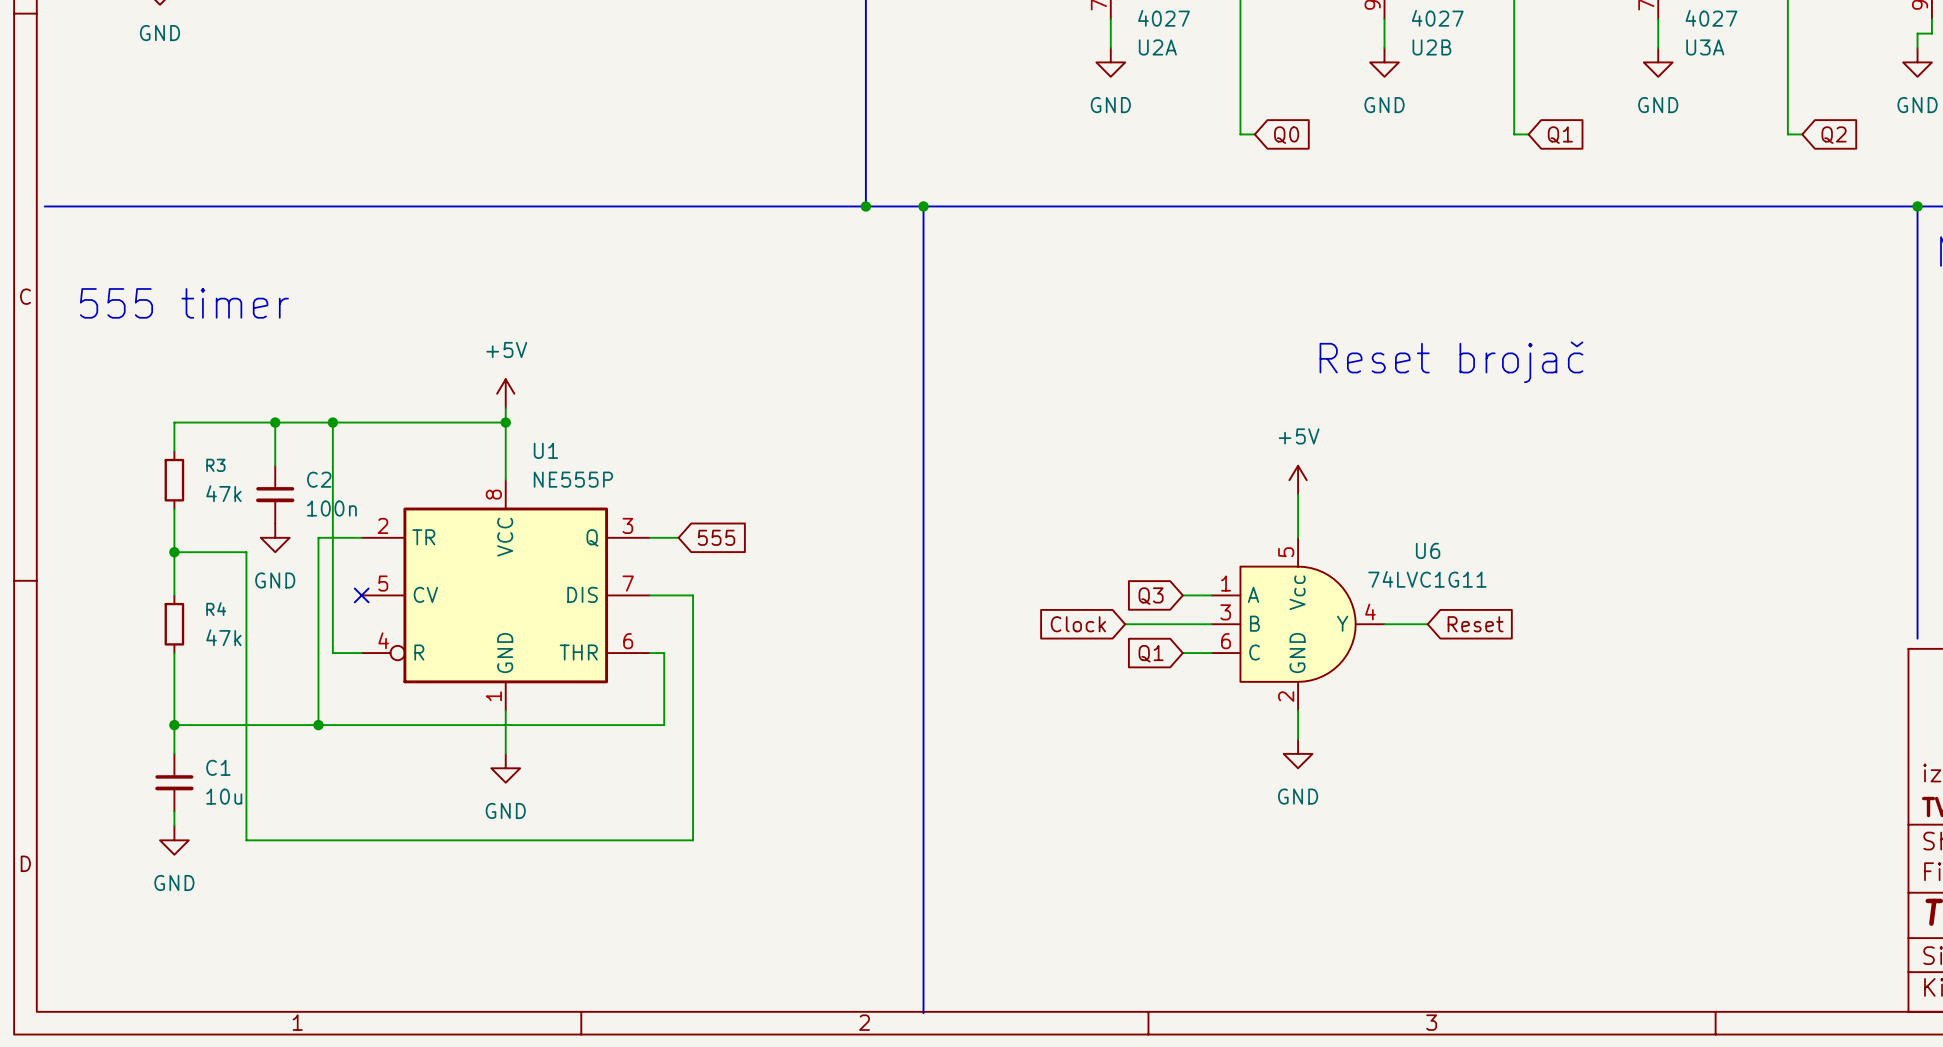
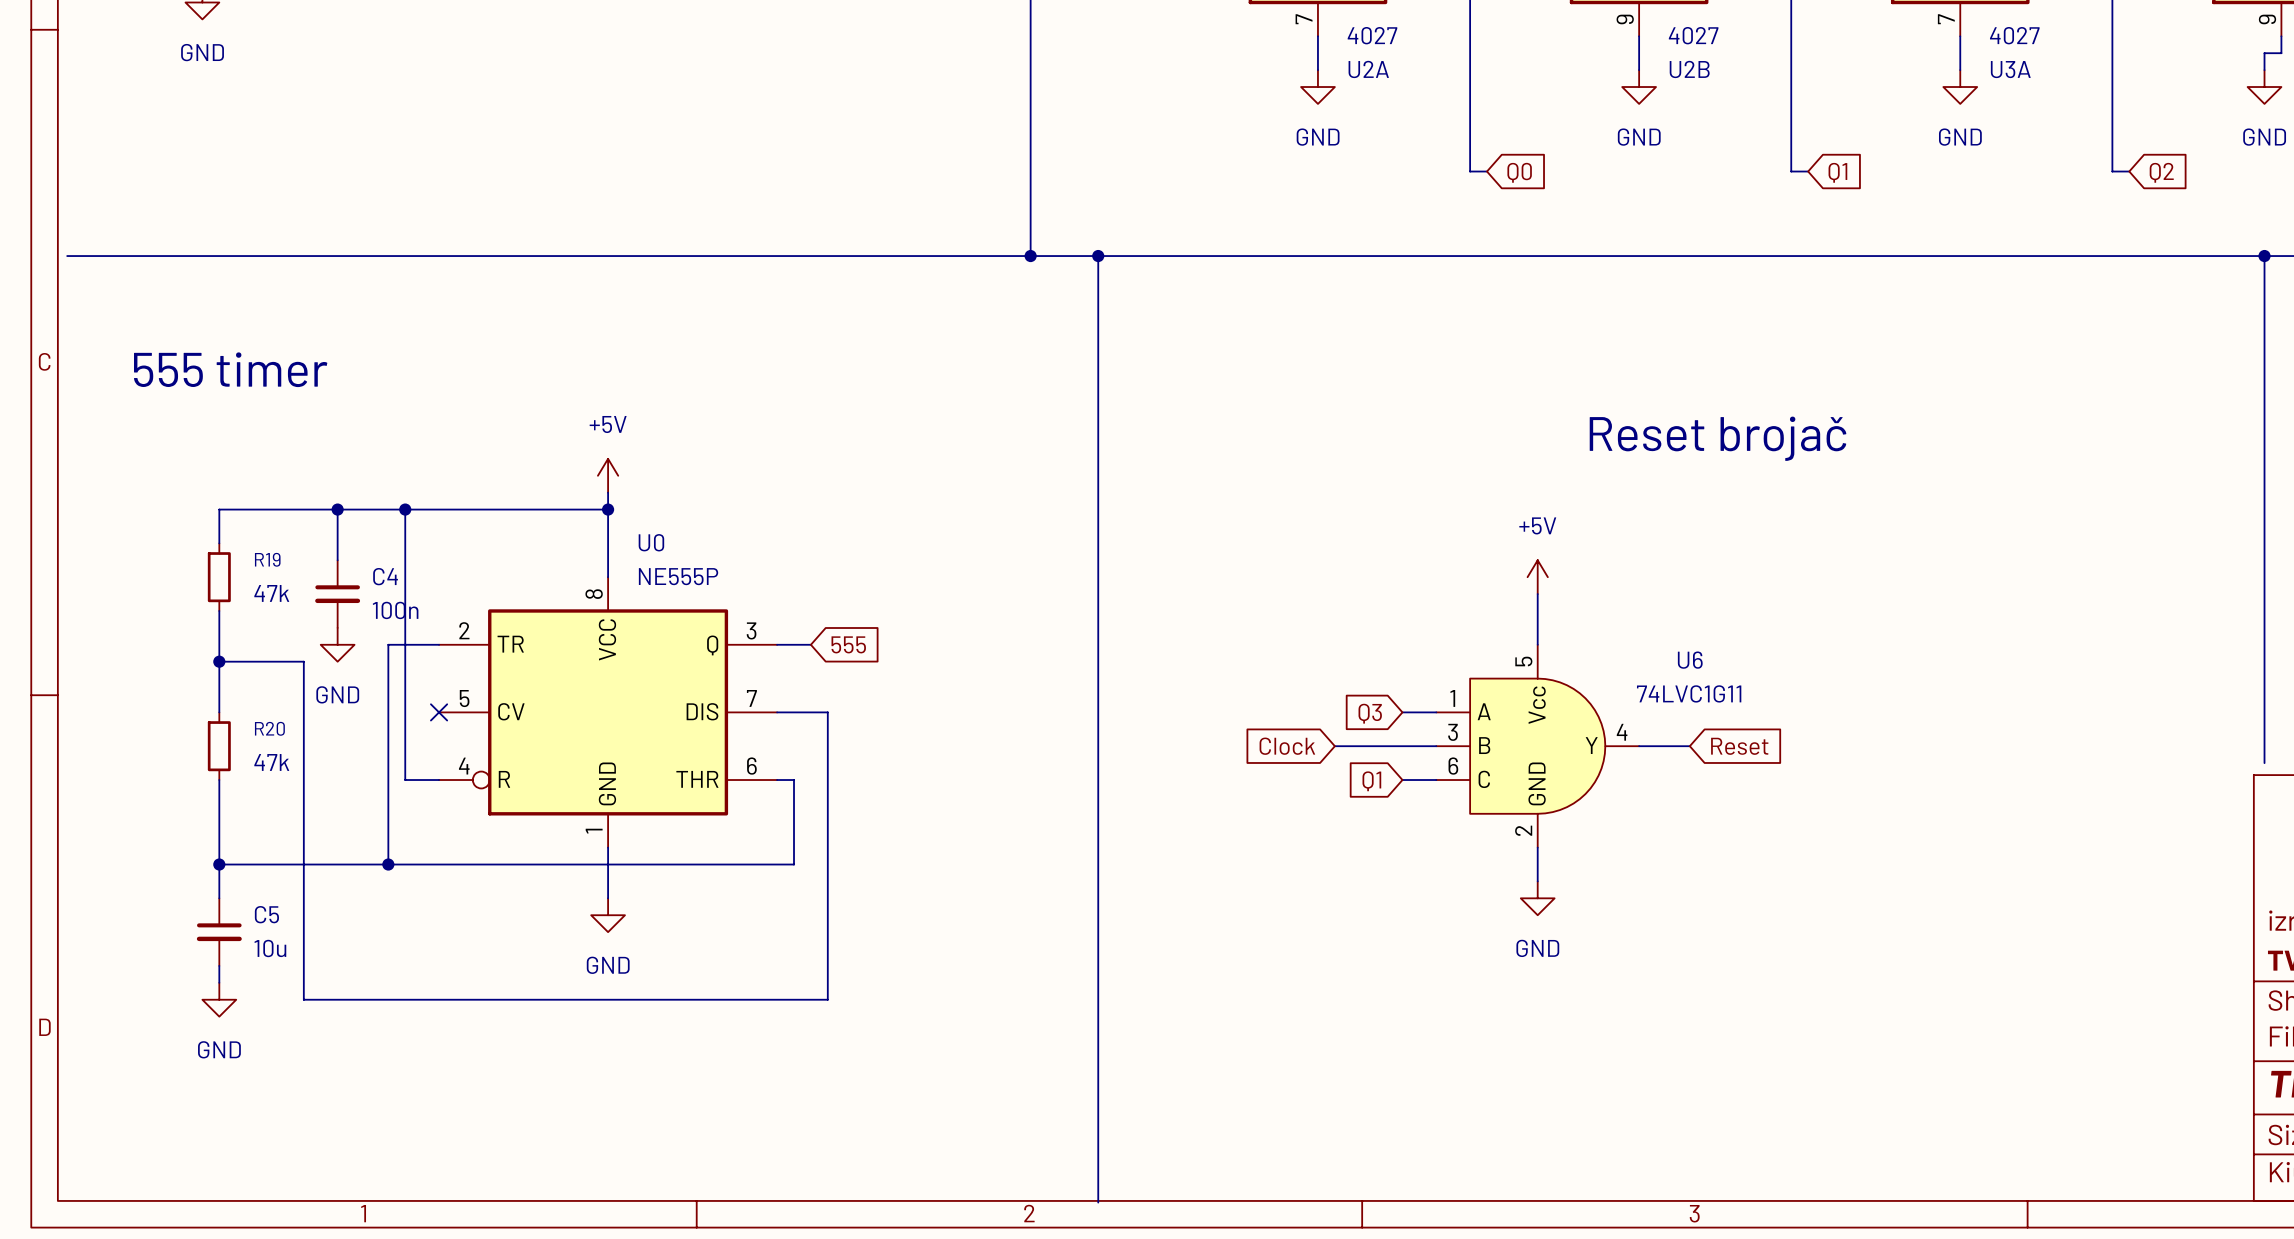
U1 name: U1 (545, 450) -> U0 (651, 542)
R3 name: R3 (215, 465) -> R19 (267, 559)
C2 name: C2 (319, 479) -> C4 (385, 576)
R4 name: R4 (216, 609) -> R20 (269, 728)
C1 name: C1 (218, 767) -> C5 (266, 914)

